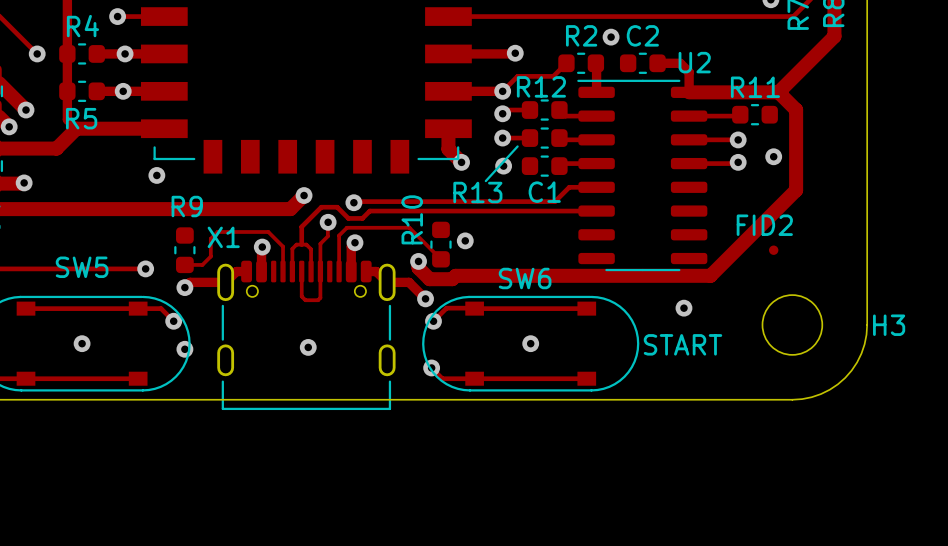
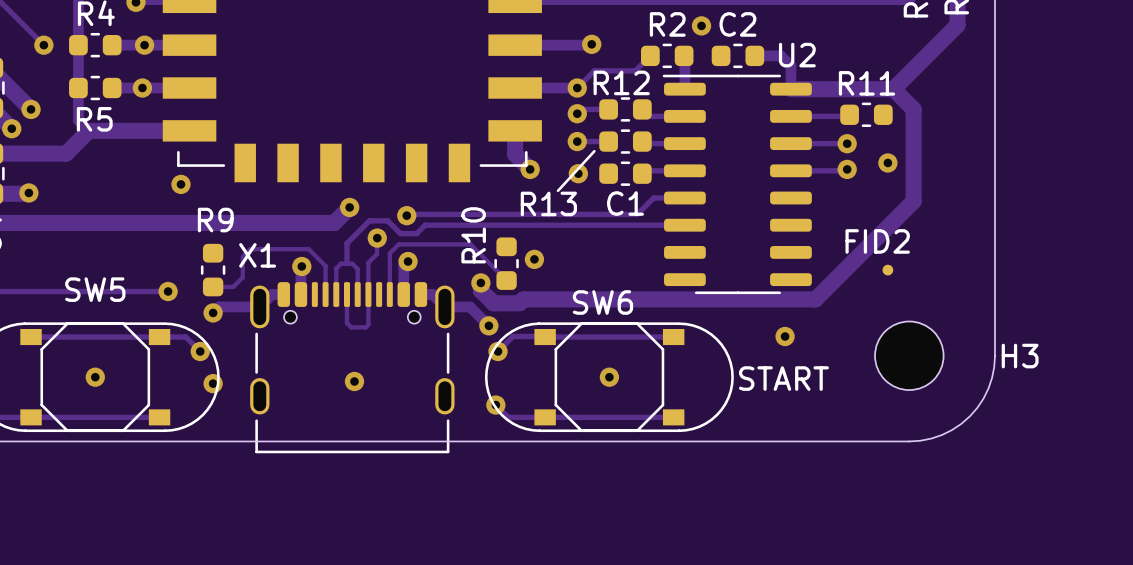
SW5 footprint: [16, 301, 148, 386] -> [20, 322, 171, 433]
SW6 footprint: [465, 301, 597, 386] -> [534, 322, 685, 433]

